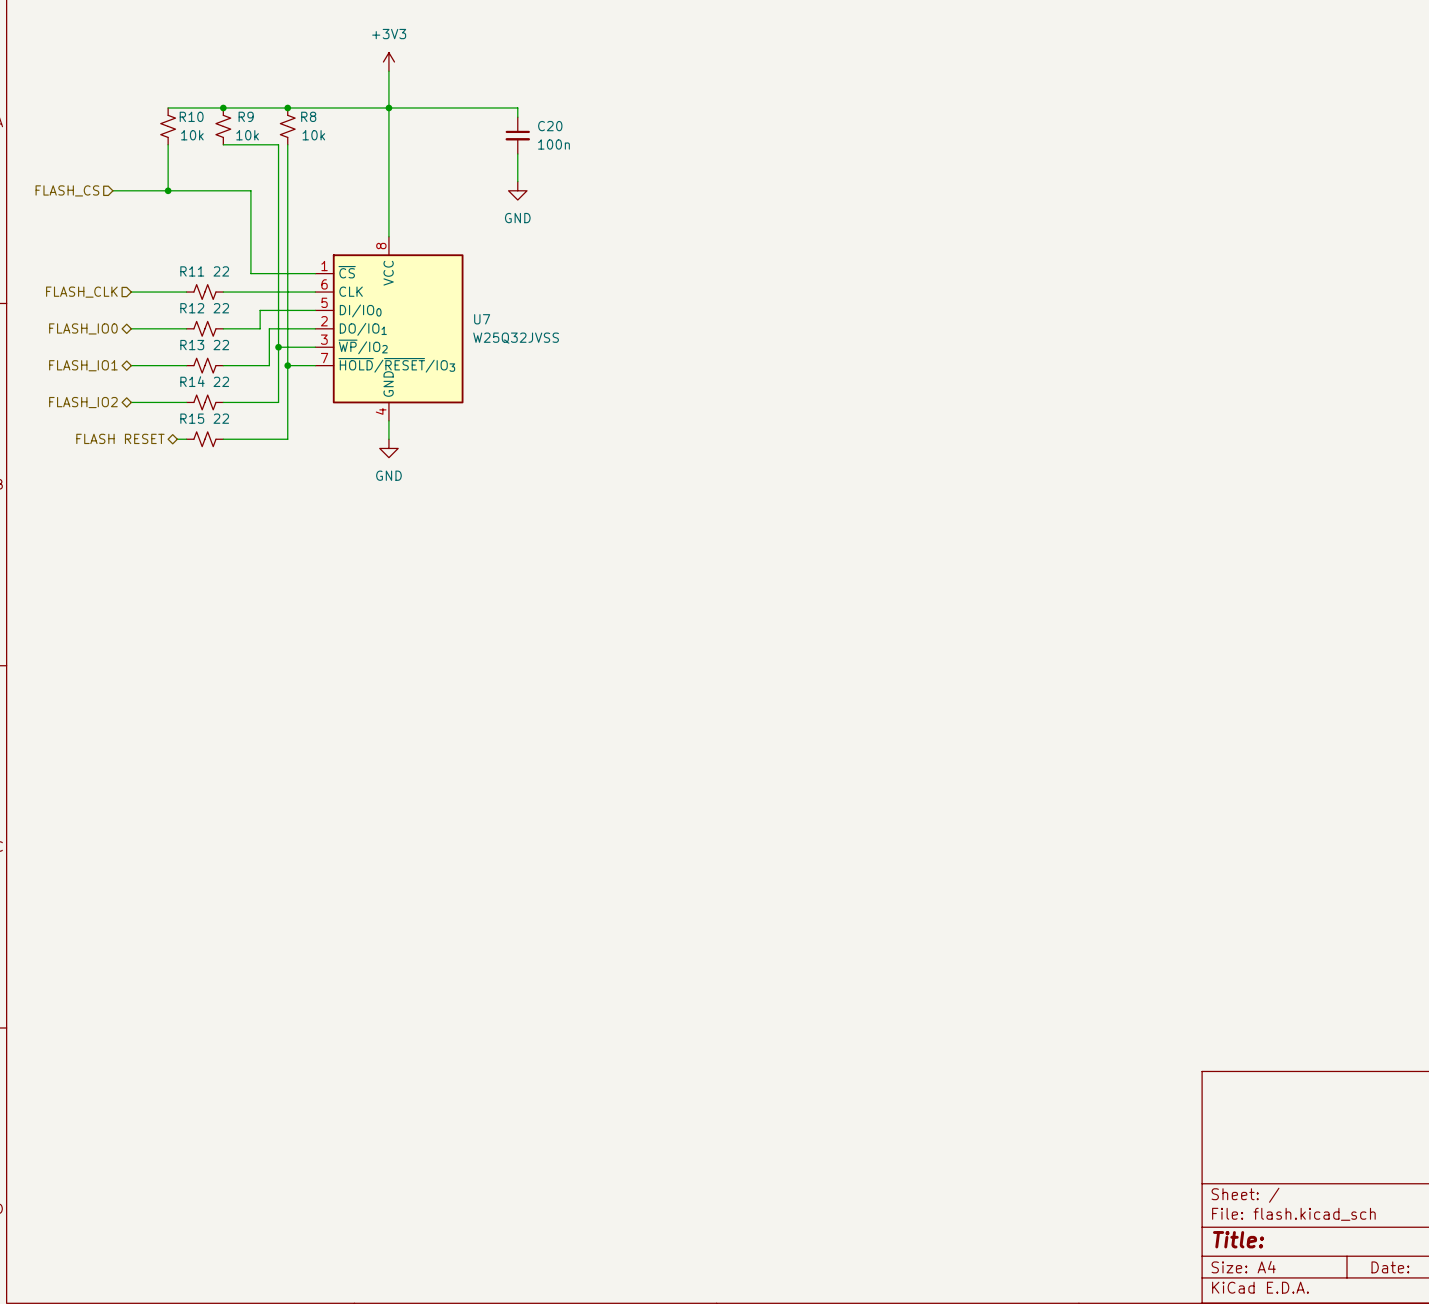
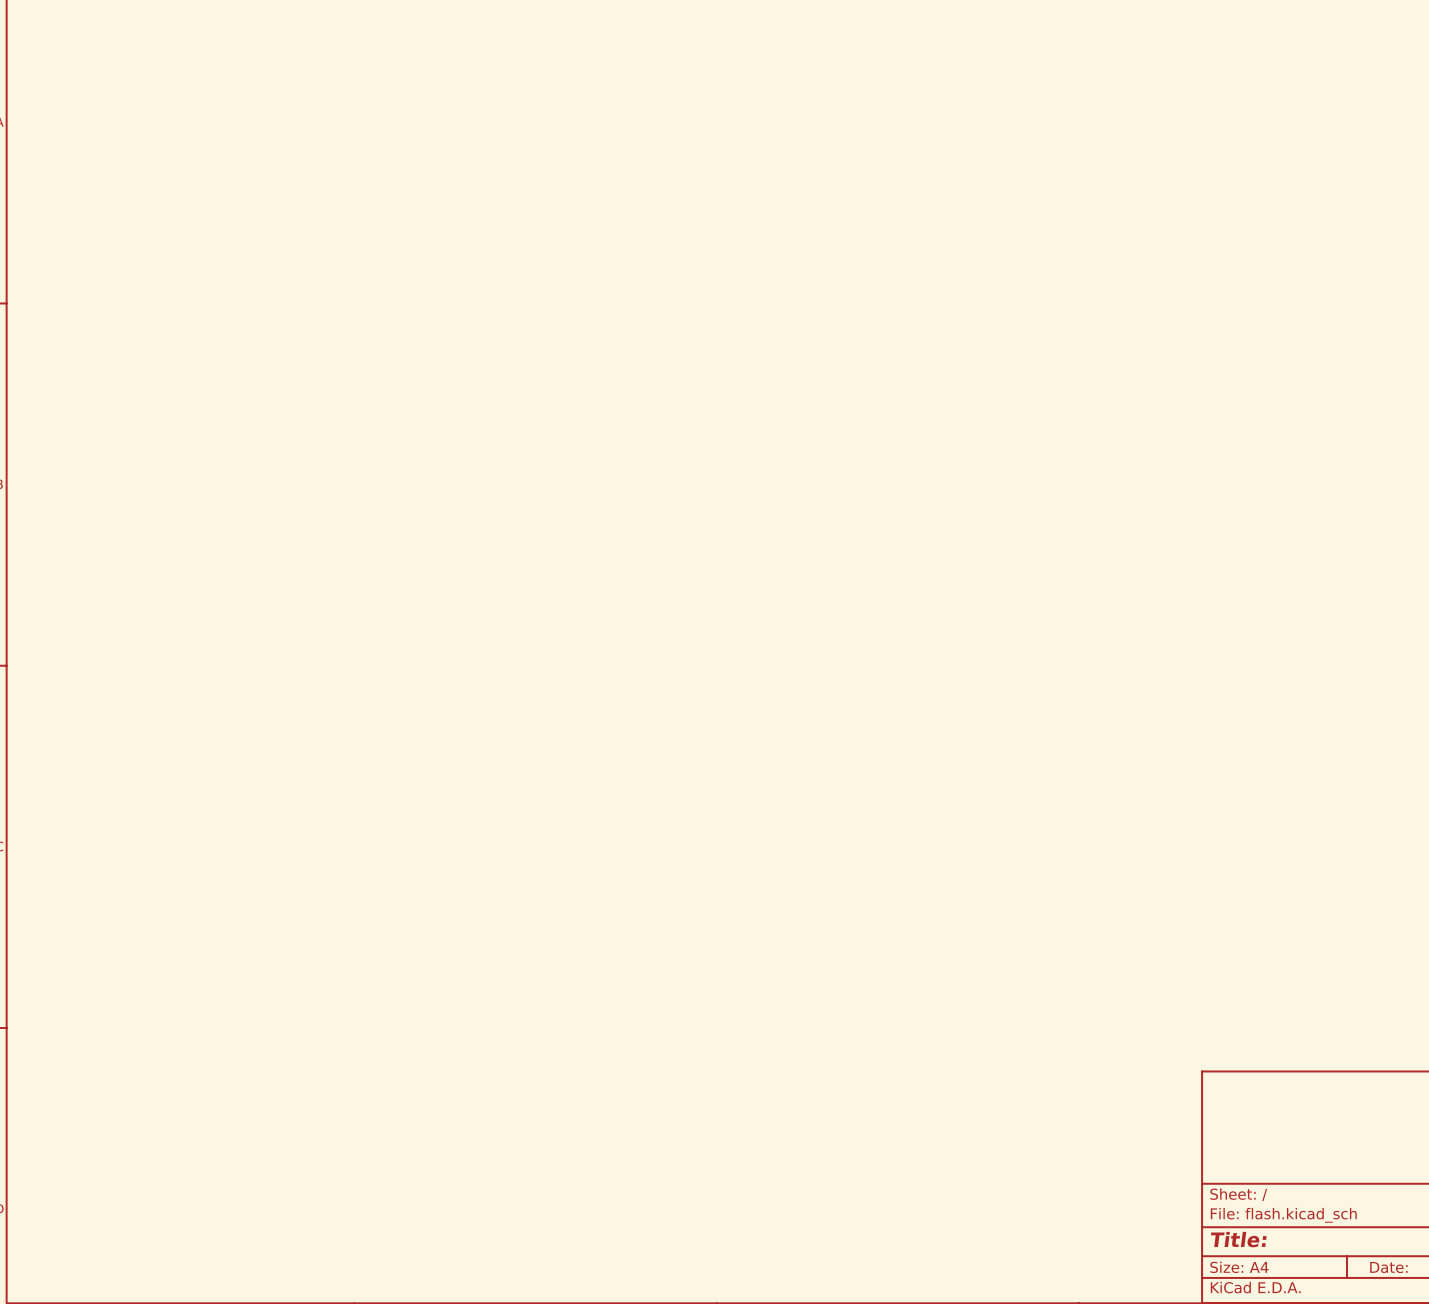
power symbol: +3V3 (388, 61) -> none
wire: (388, 71) (388, 236) -> none
wire: (168, 107) (517, 107) (517, 117) -> none
junction: (223, 107) -> none
junction: (287, 107) -> none
junction: (388, 107) -> none
R10: 10k (168, 126) -> none
R9: 10k (223, 126) -> none
R8: 10k (287, 126) -> none
C20: 100n (517, 135) -> none
wire: (168, 144) (168, 190) -> none
wire: (223, 144) (278, 144) (278, 402) (223, 402) -> none
wire: (287, 144) (287, 439) (223, 439) -> none
wire: (517, 154) (517, 181) -> none
hierarchical label: FLASH_CS (67, 190) -> none
wire: (112, 190) (250, 190) (250, 273) (315, 273) -> none
junction: (168, 190) -> none
power symbol: GND (517, 190) -> none
hierarchical label: FLASH_CLK (81, 292) -> none
wire: (131, 292) (186, 292) -> none
R11: 22 (204, 292) -> none
wire: (223, 292) (315, 292) -> none
wire: (315, 310) (260, 310) (260, 328) (223, 328) -> none
hierarchical label: FLASH_IO0 (83, 328) -> none
wire: (131, 328) (186, 328) -> none
R12: 22 (204, 328) -> none
wire: (315, 328) (269, 328) (269, 365) (223, 365) -> none
U7: W25Q32JVSS (389, 328) -> none
wire: (278, 347) (315, 347) -> none
junction: (278, 347) -> none
hierarchical label: FLASH_IO1 (83, 365) -> none
wire: (131, 365) (186, 365) -> none
R13: 22 (204, 365) -> none
wire: (287, 365) (315, 365) -> none
junction: (287, 365) -> none
hierarchical label: FLASH_IO2 (83, 402) -> none
wire: (131, 402) (186, 402) -> none
R14: 22 (204, 402) -> none
wire: (388, 420) (388, 439) -> none
hierarchical label: FLASH RESET (120, 438) -> none
wire: (177, 439) (186, 439) -> none
R15: 22 (204, 439) -> none
power symbol: GND (388, 448) -> none

